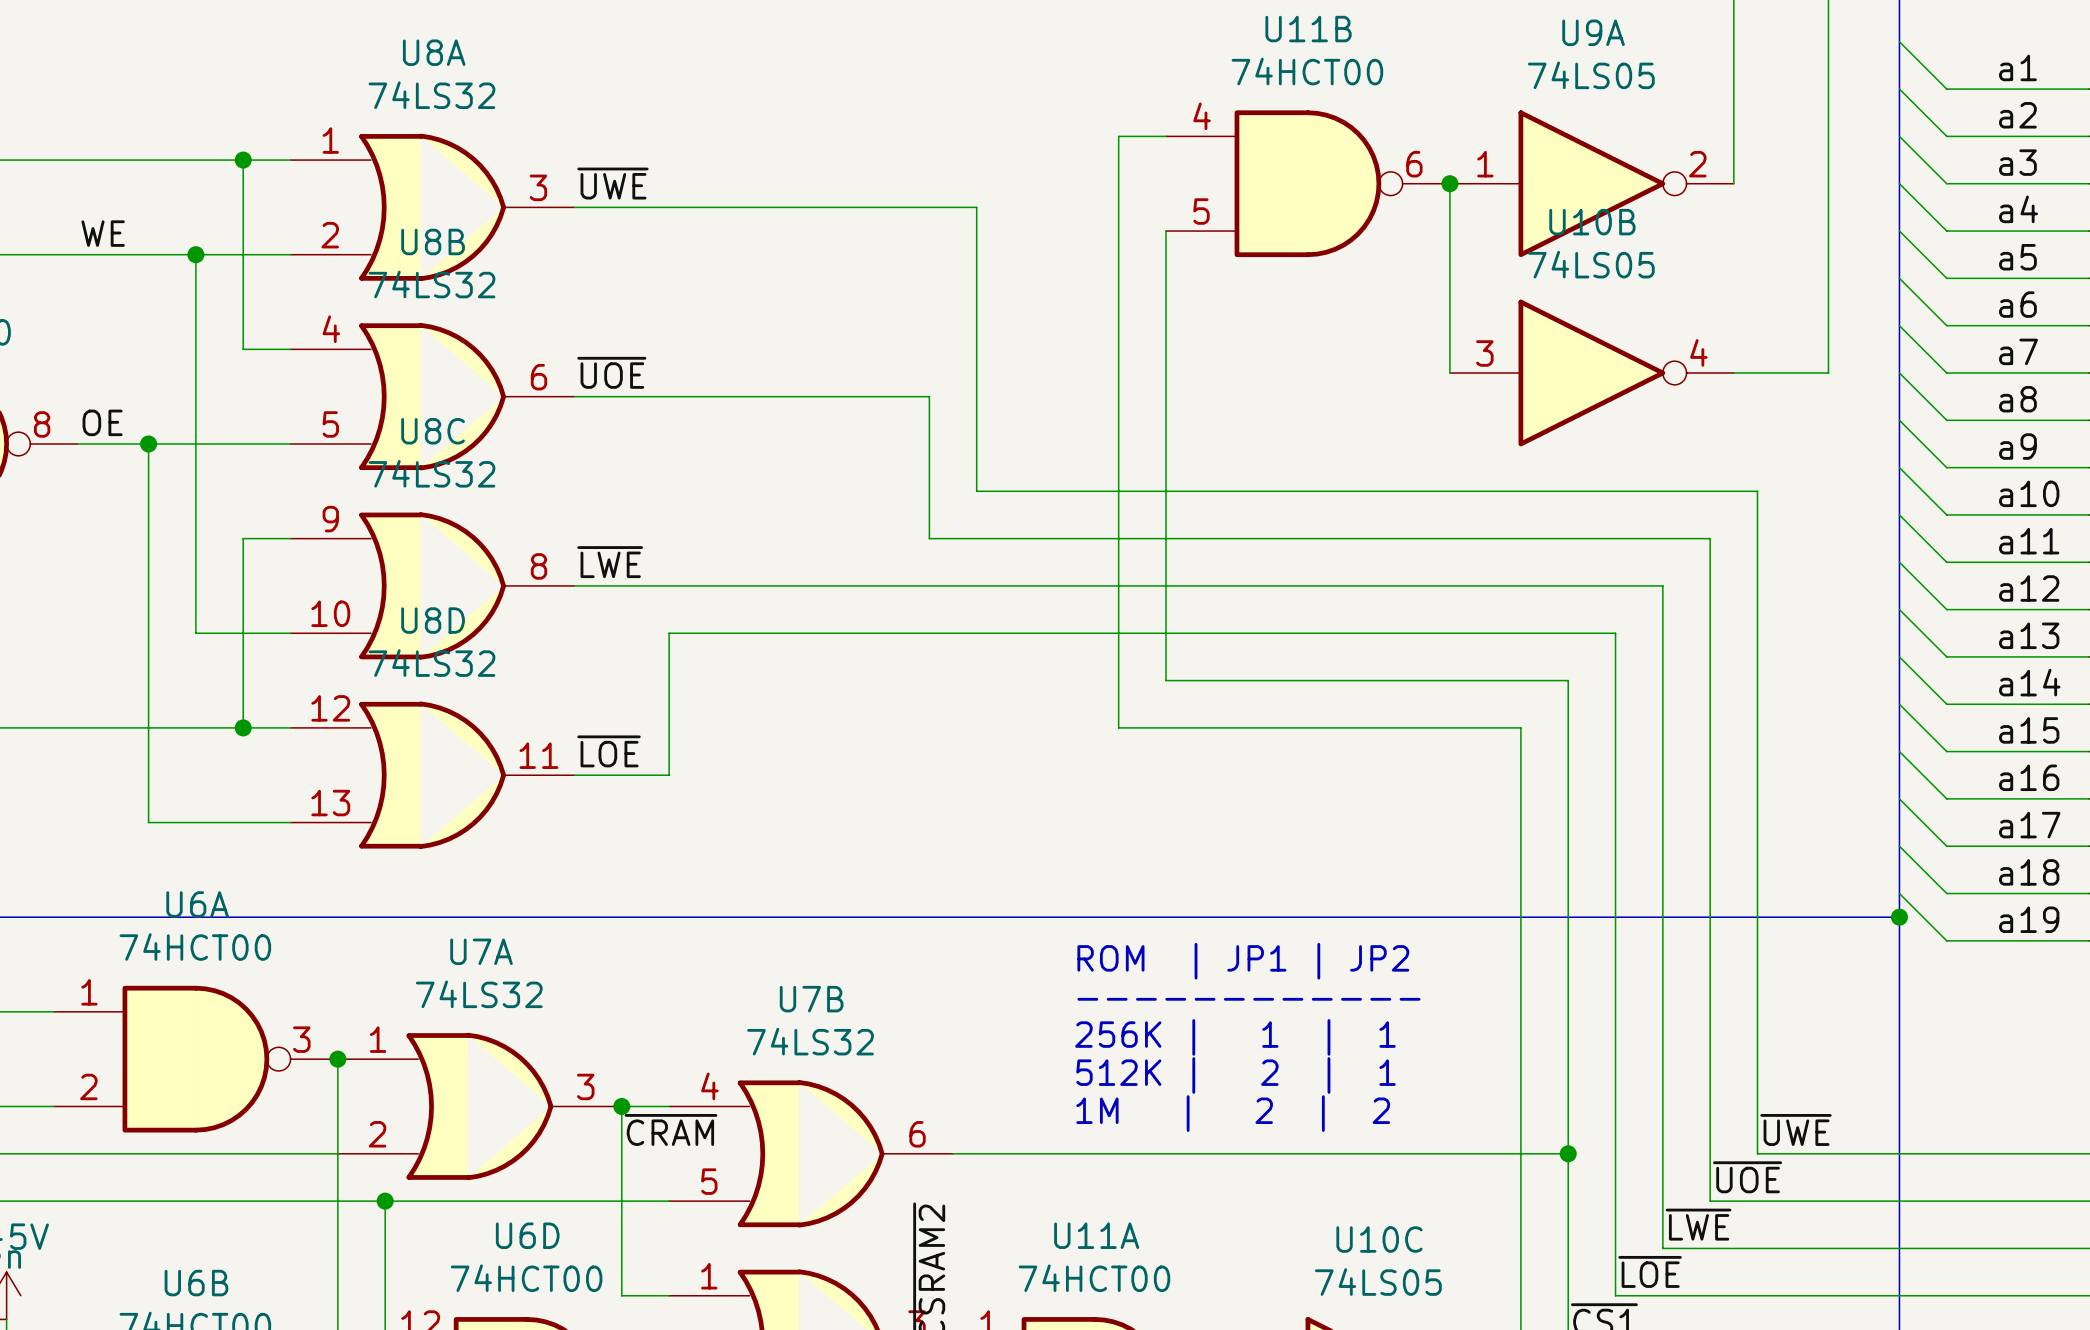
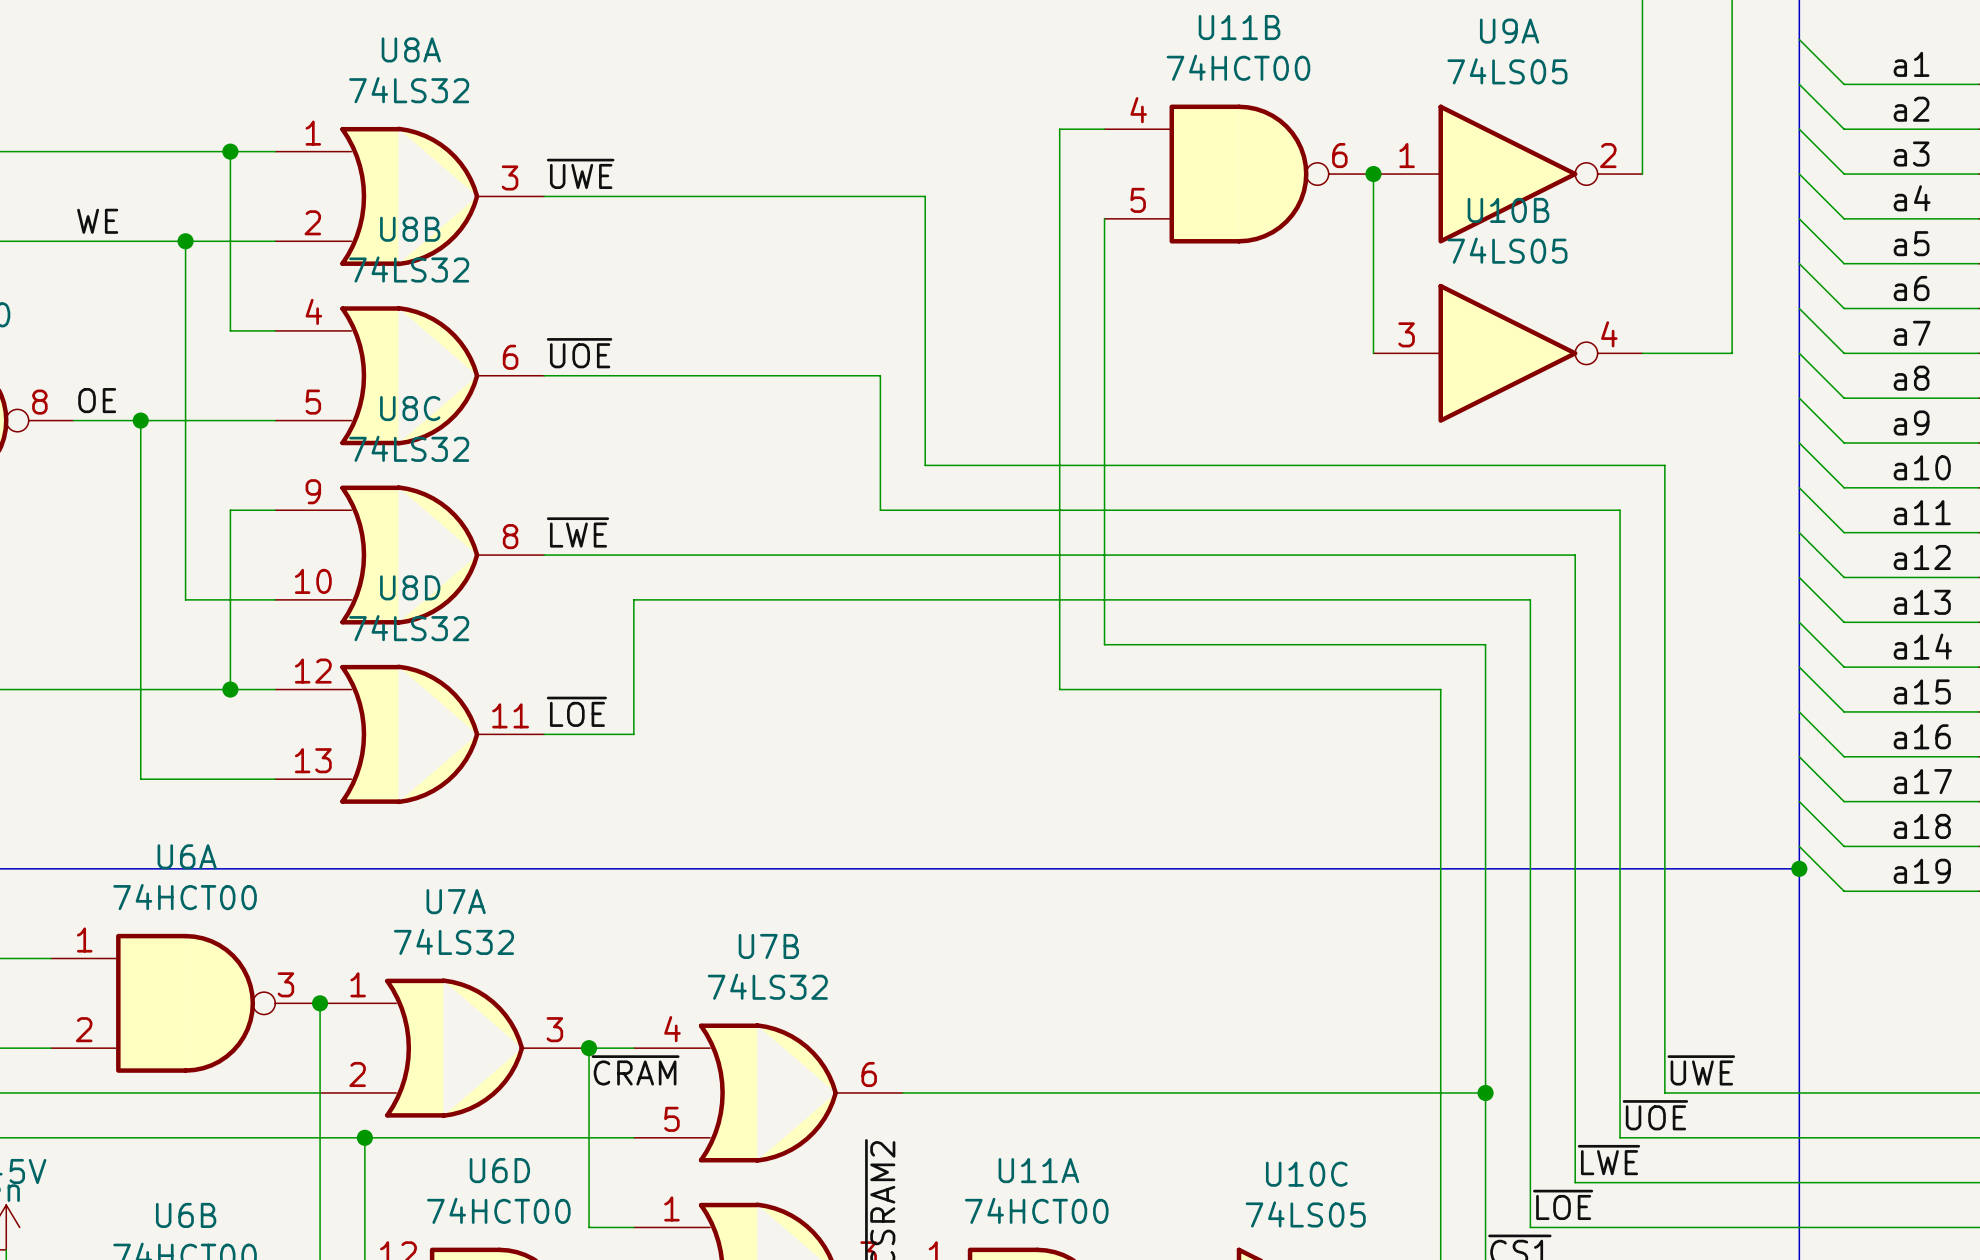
text: ROM | JP1 | JP2 (1243, 961) -> none
text: ------------ (1248, 999) -> none
text: 256K | 1 | 1 (1235, 1037) -> none
text: 512K | 2 | 1 (1236, 1075) -> none
text: 1M | 2 | 2 (1233, 1113) -> none

